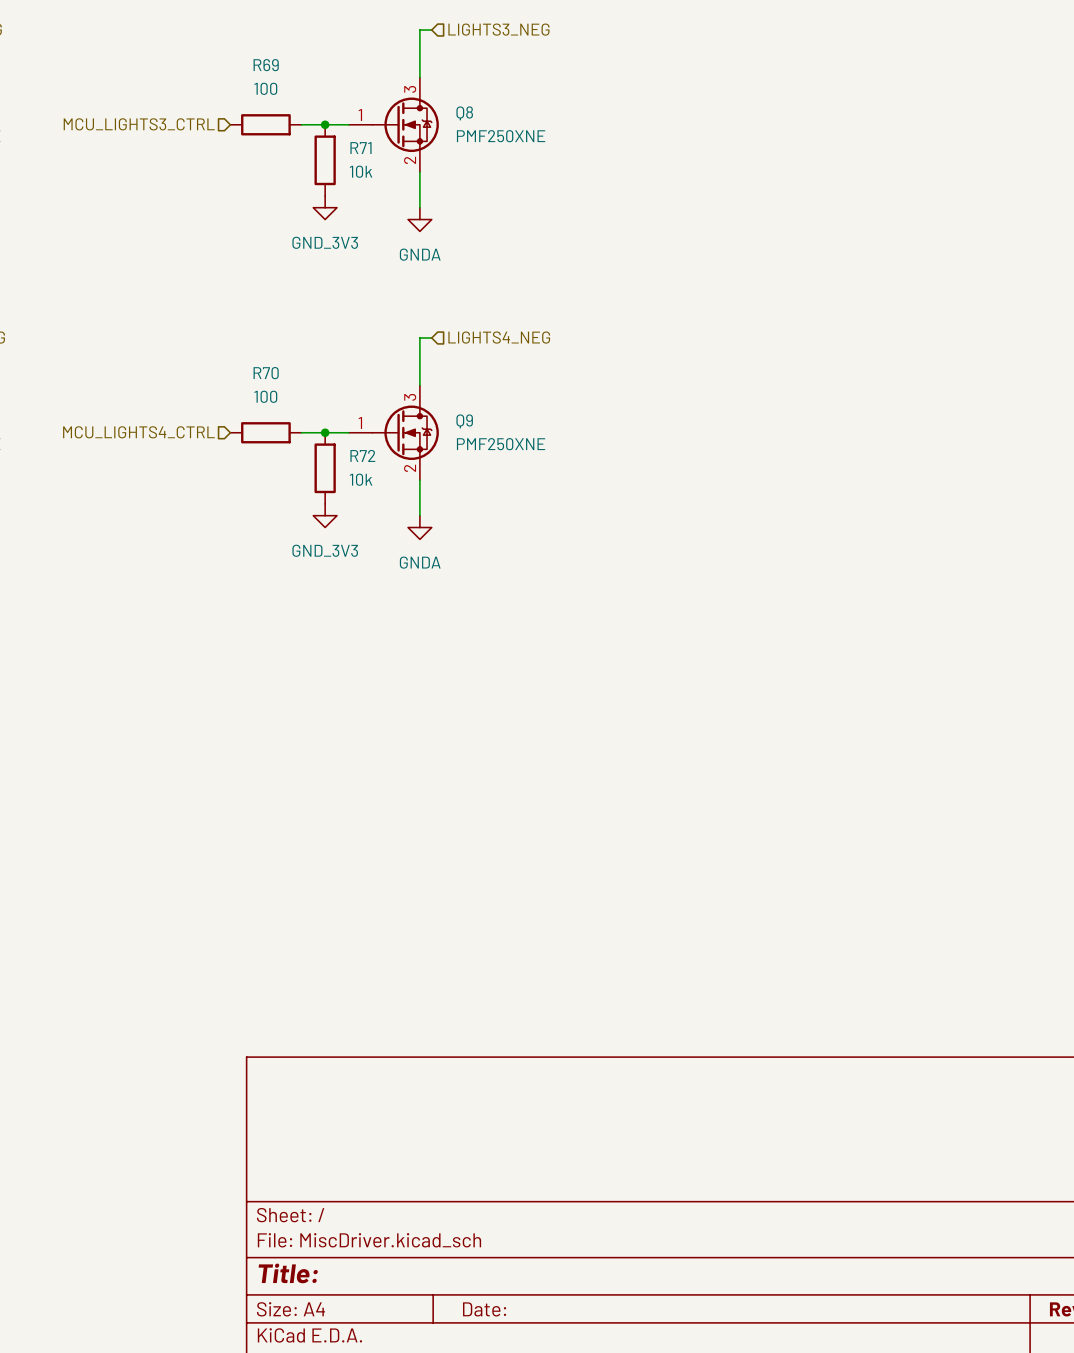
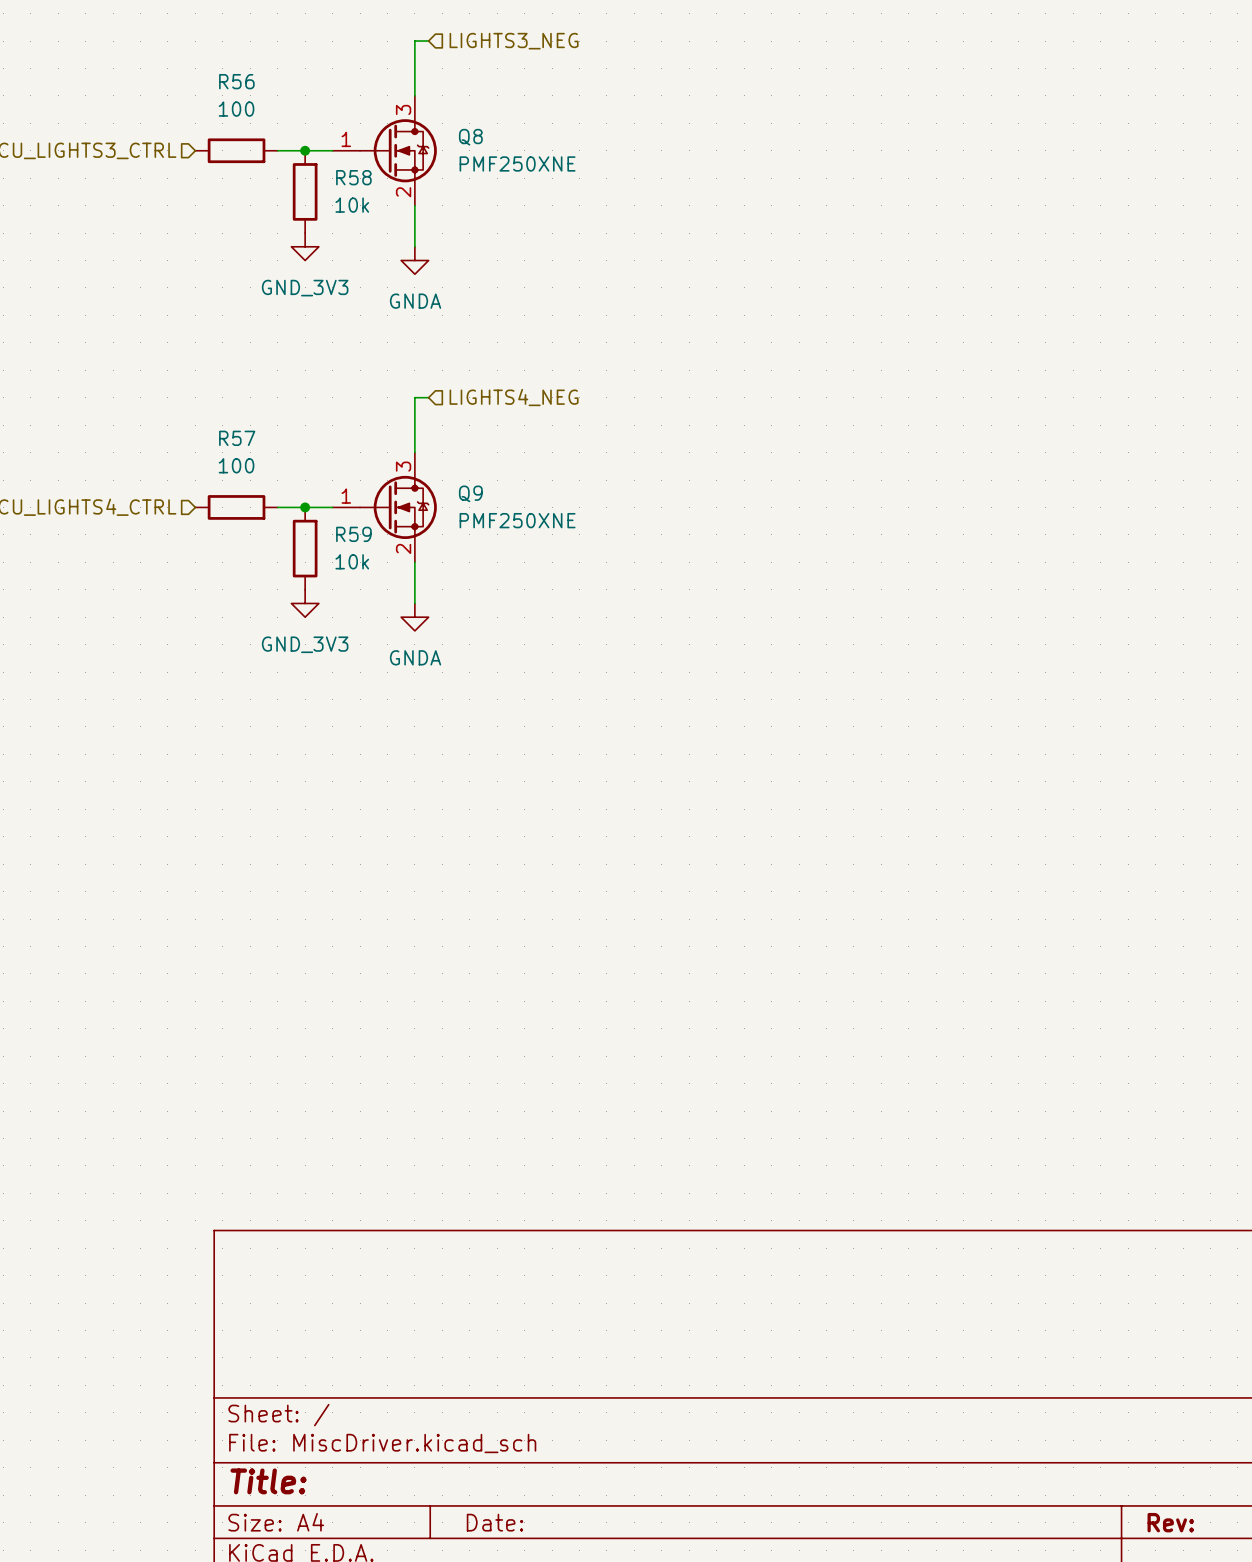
R69 name: R69 (266, 65) -> R56 (236, 81)
R71 name: R71 (360, 148) -> R58 (353, 177)
R70 name: R70 (266, 373) -> R57 (237, 438)
R72 name: R72 (362, 455) -> R59 (353, 534)

